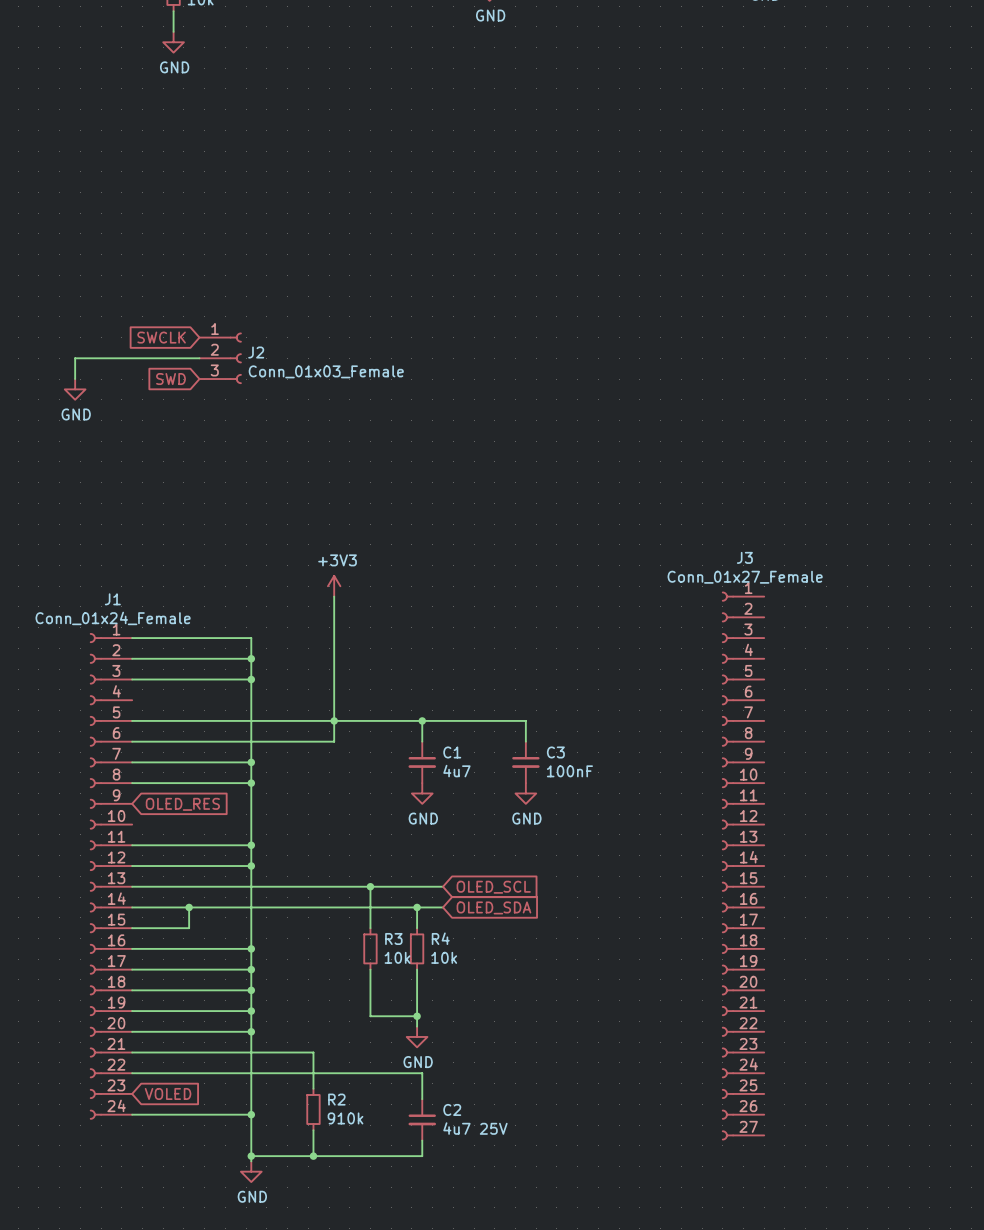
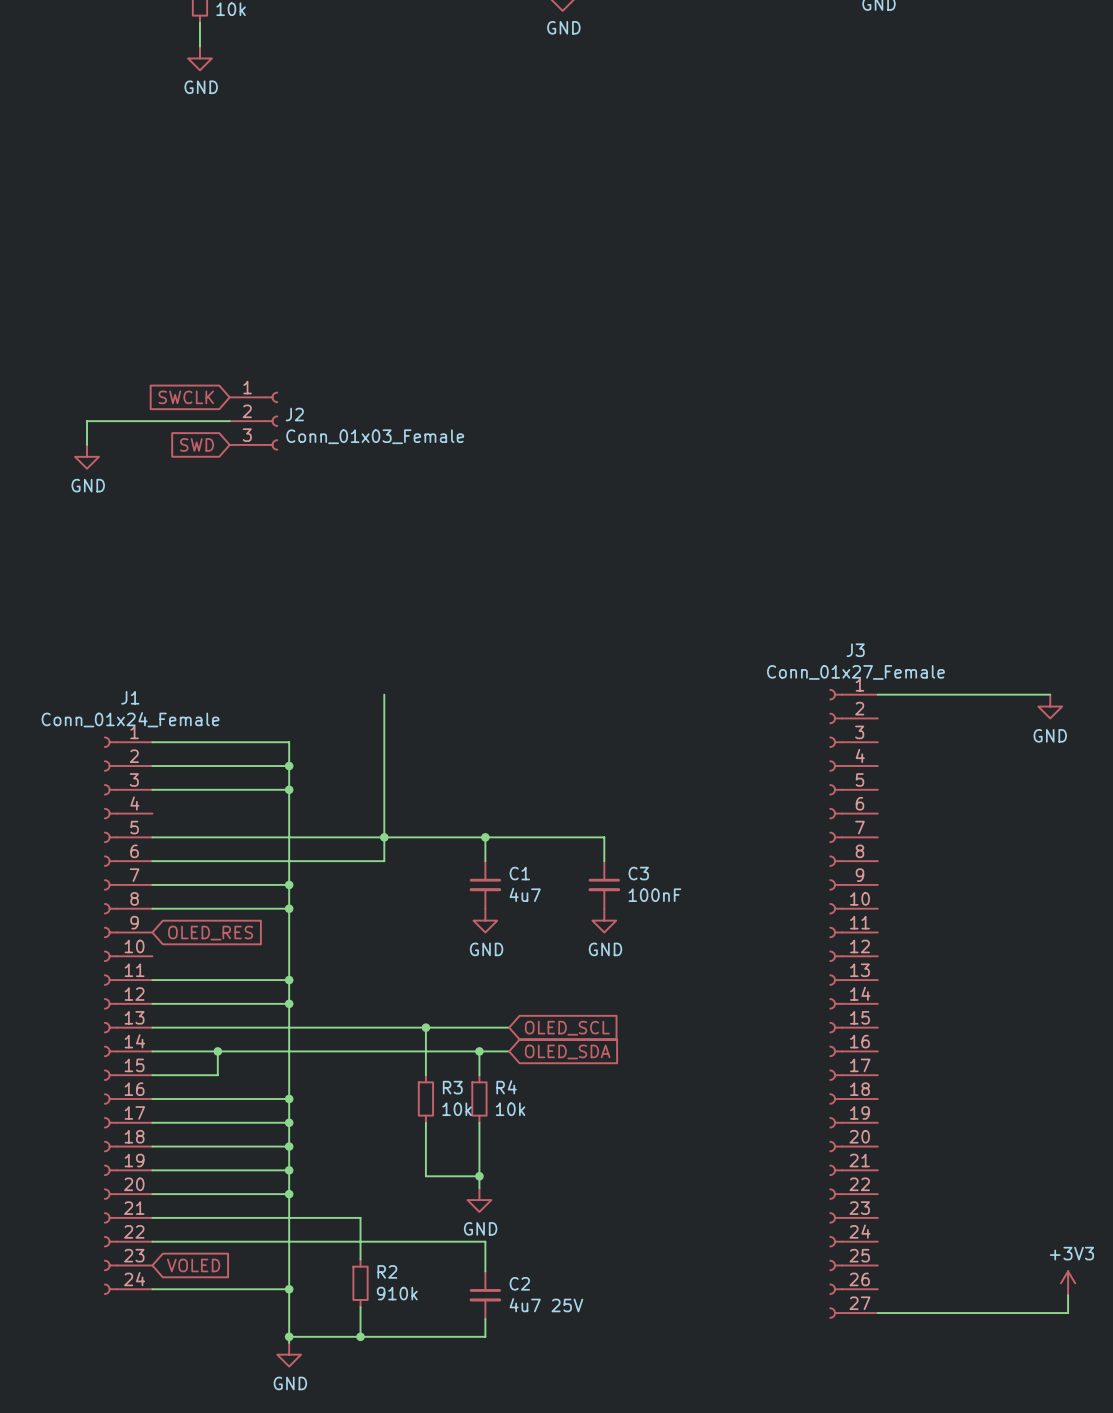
power symbol: +3V3 (334, 586) -> none
wire: none -> (877, 694) (1050, 694)
power symbol: none -> GND (1050, 706)
power symbol: none -> +3V3 (1068, 1283)
wire: none -> (1068, 1295) (1068, 1313) (877, 1313)

